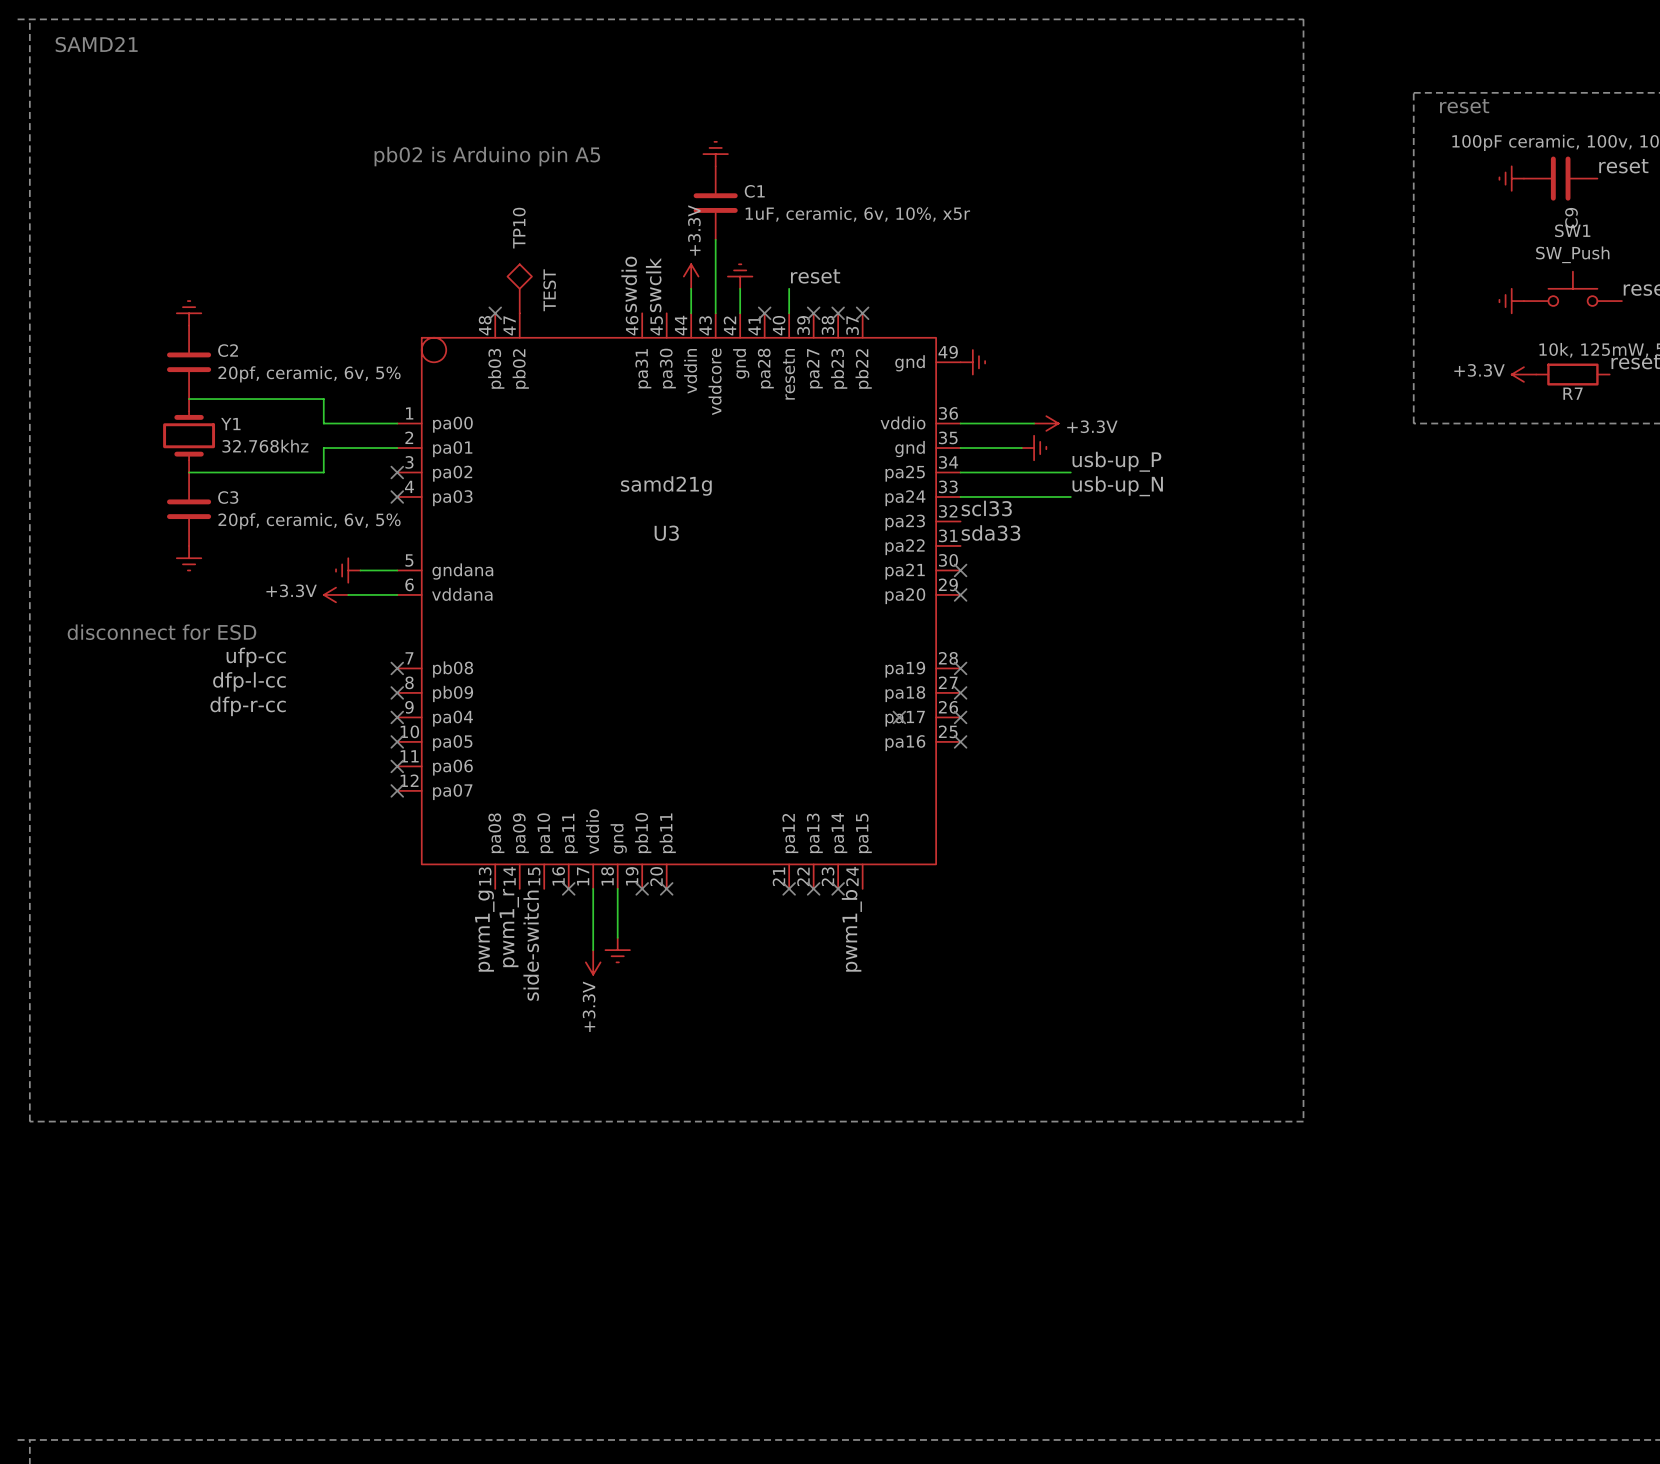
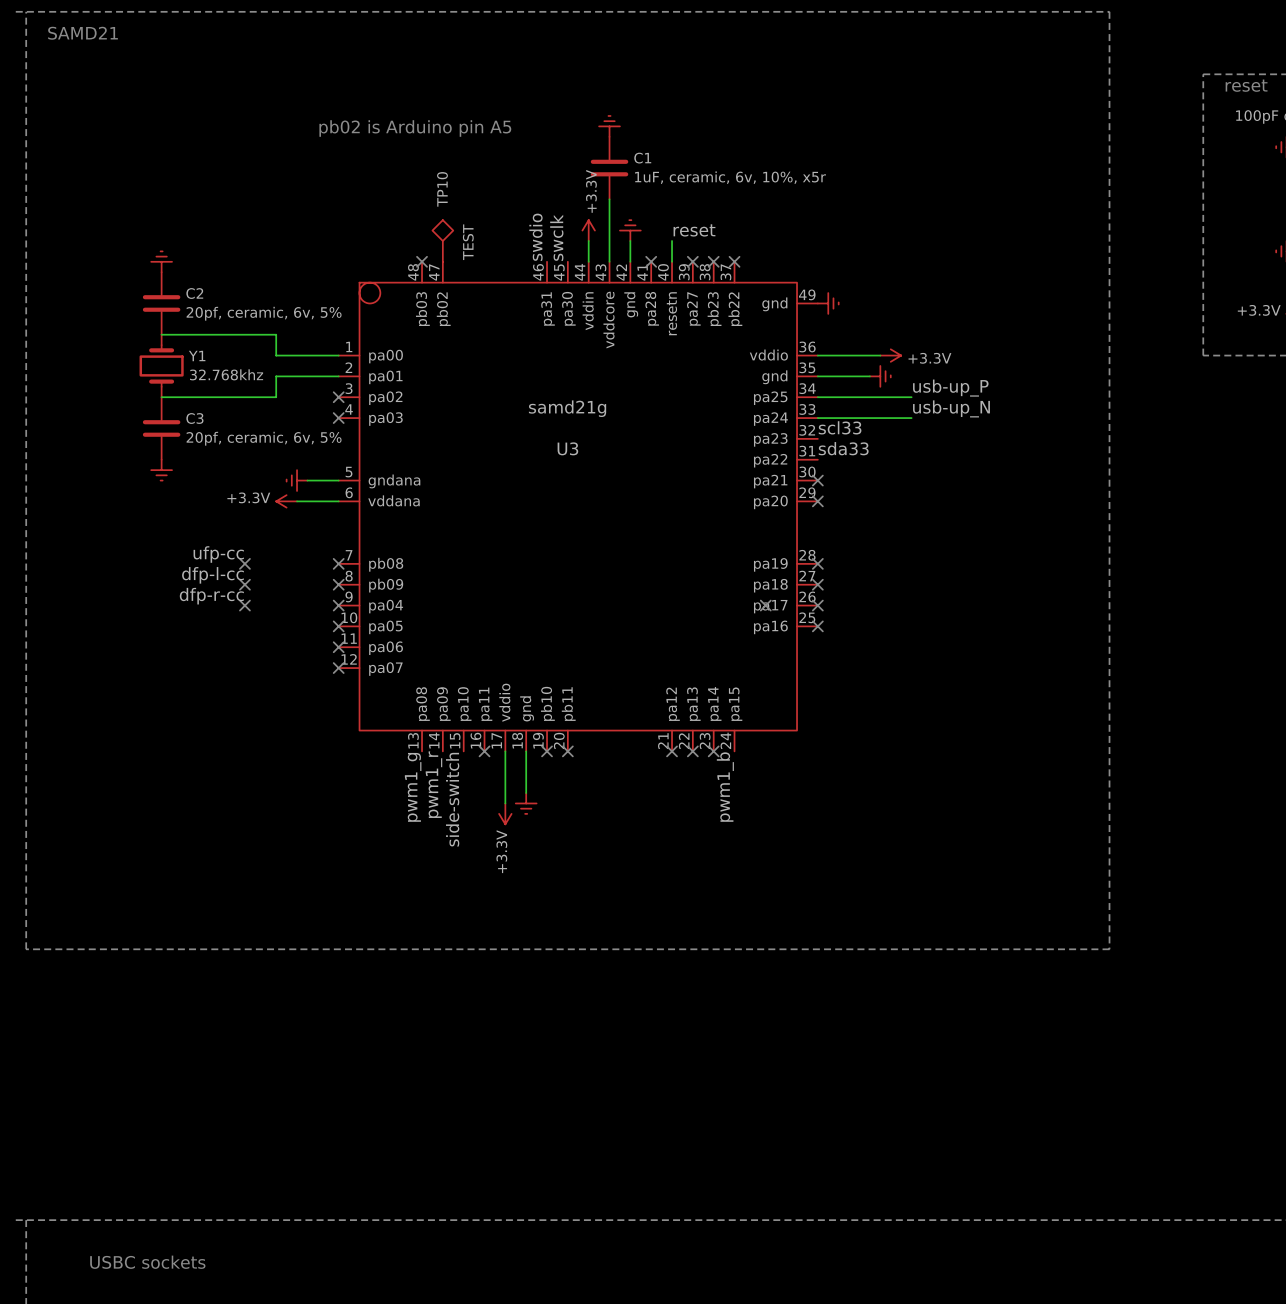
text: disconnect for ESD (161, 632) -> none
no-connect mark: none -> (244, 563)
no-connect mark: none -> (244, 584)
no-connect mark: none -> (244, 605)

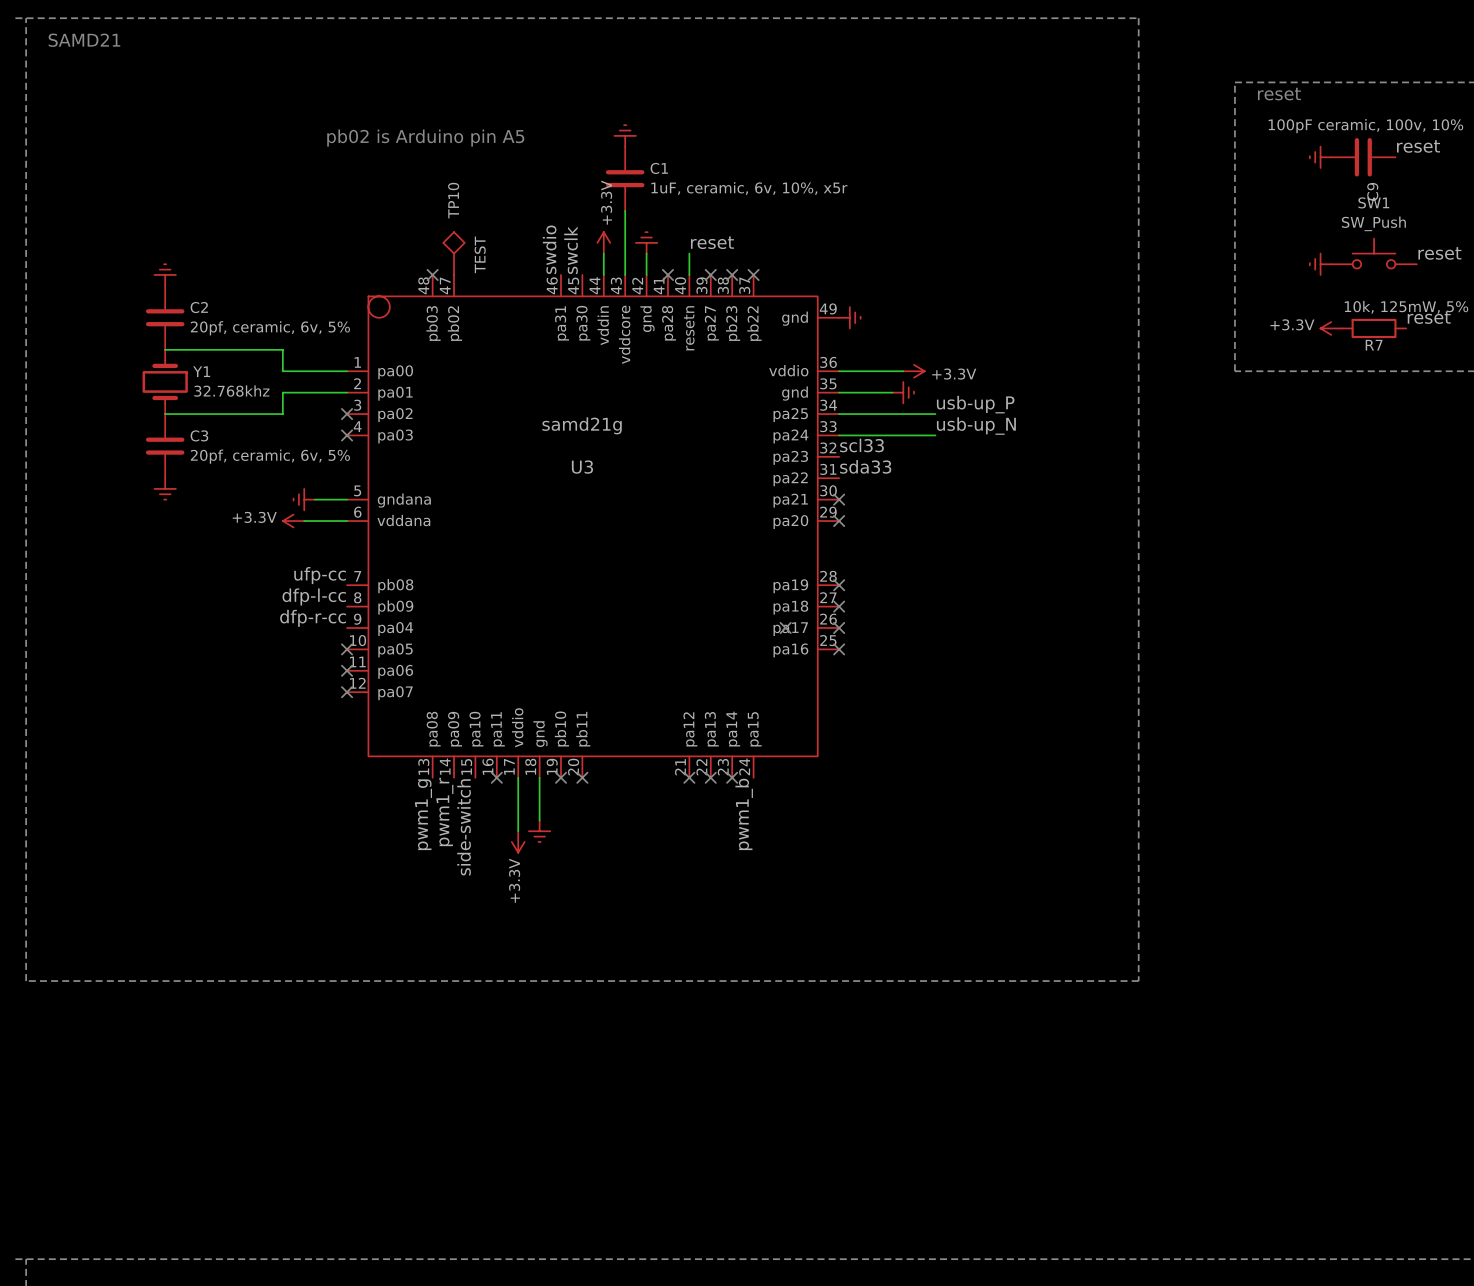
label position: ufp-cc (218, 554) -> ufp-cc (320, 575)
no-connect mark: (244, 563) -> none
no-connect mark: (338, 563) -> none
label position: dfp-l-cc (212, 575) -> dfp-l-cc (314, 596)
no-connect mark: (244, 584) -> none
no-connect mark: (338, 584) -> none
label position: dfp-r-cc (211, 596) -> dfp-r-cc (313, 618)
no-connect mark: (244, 605) -> none
no-connect mark: (338, 605) -> none

